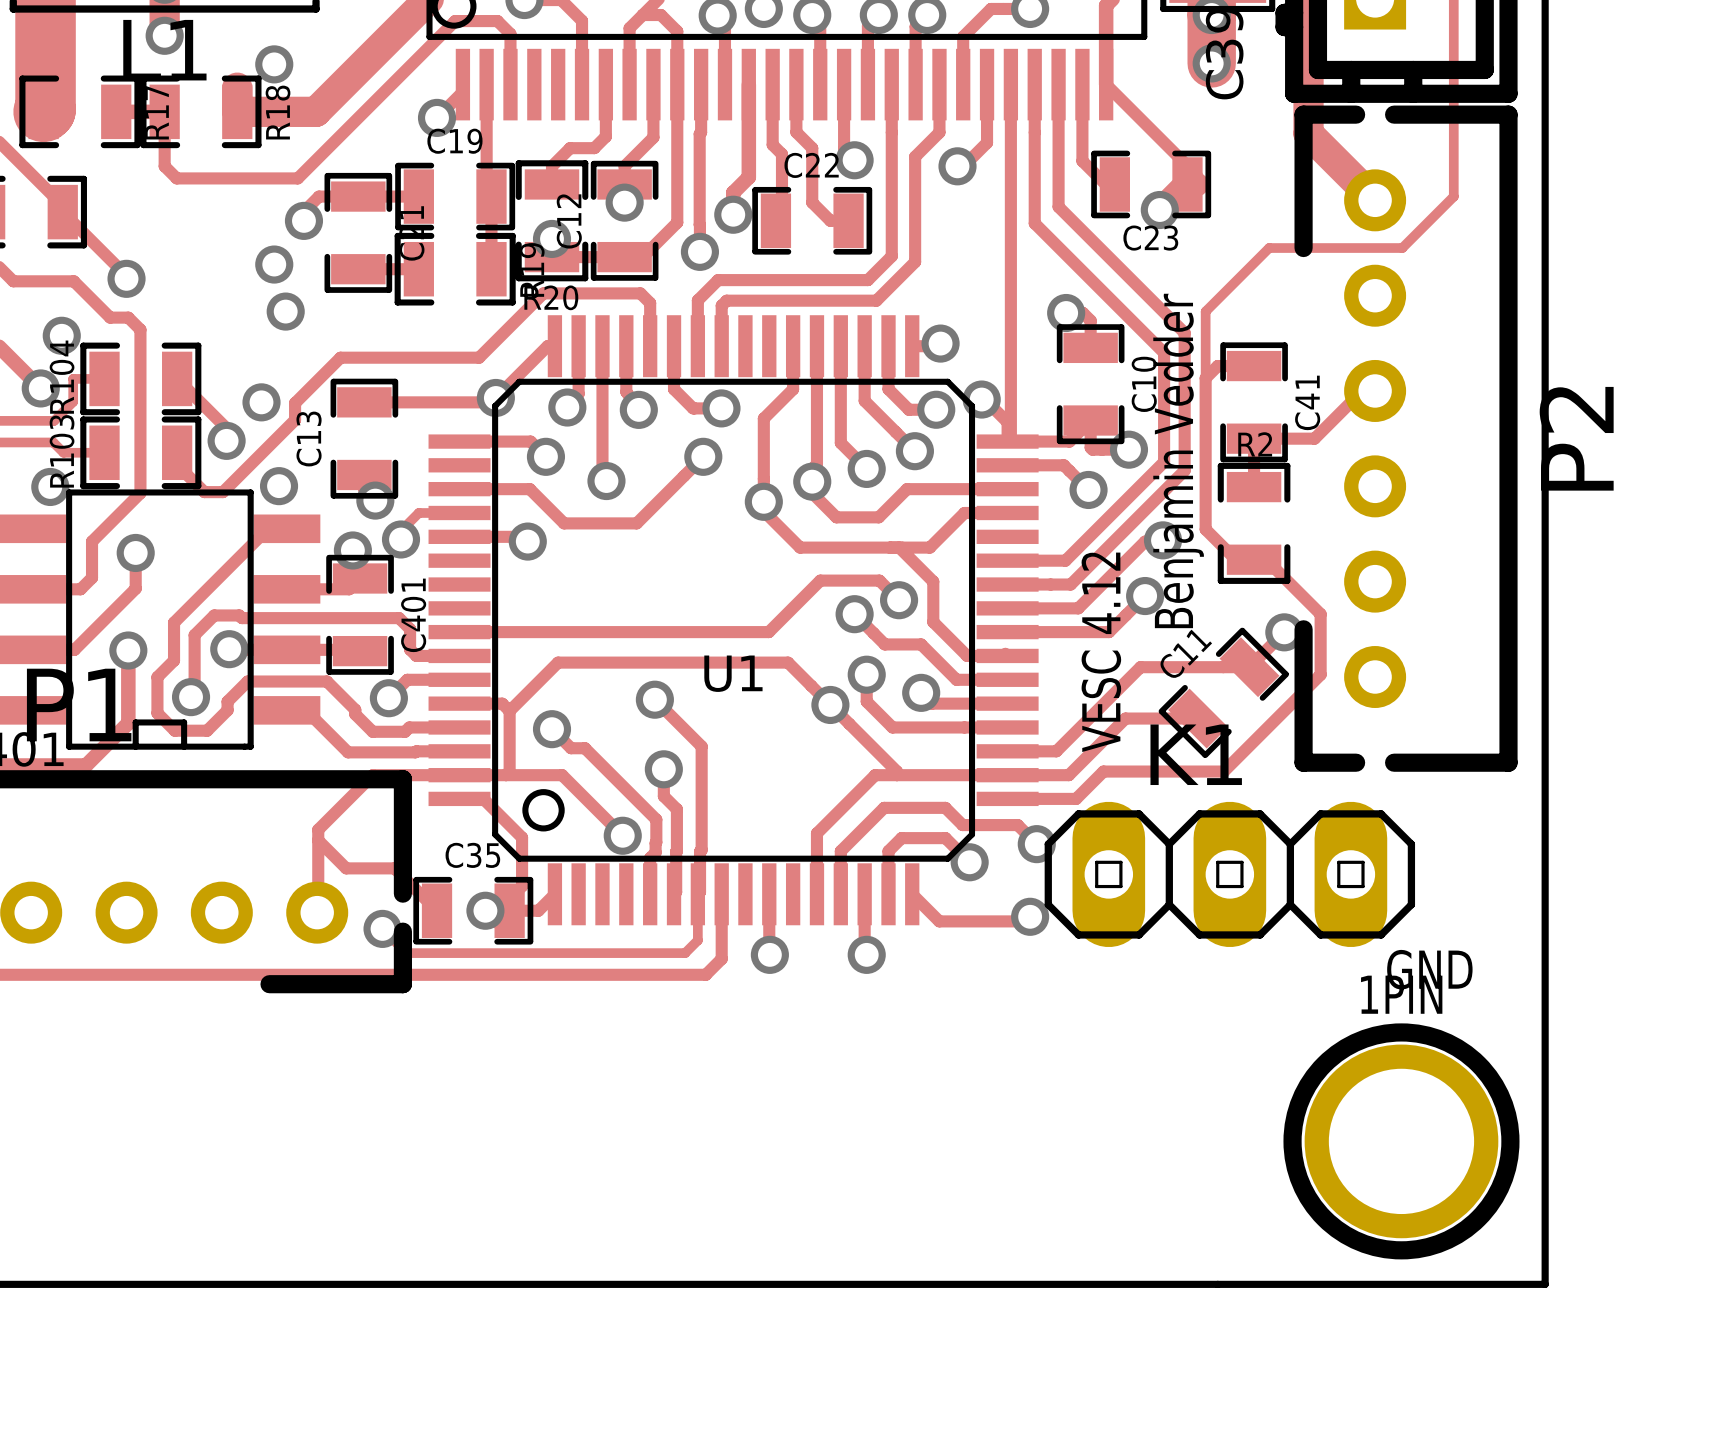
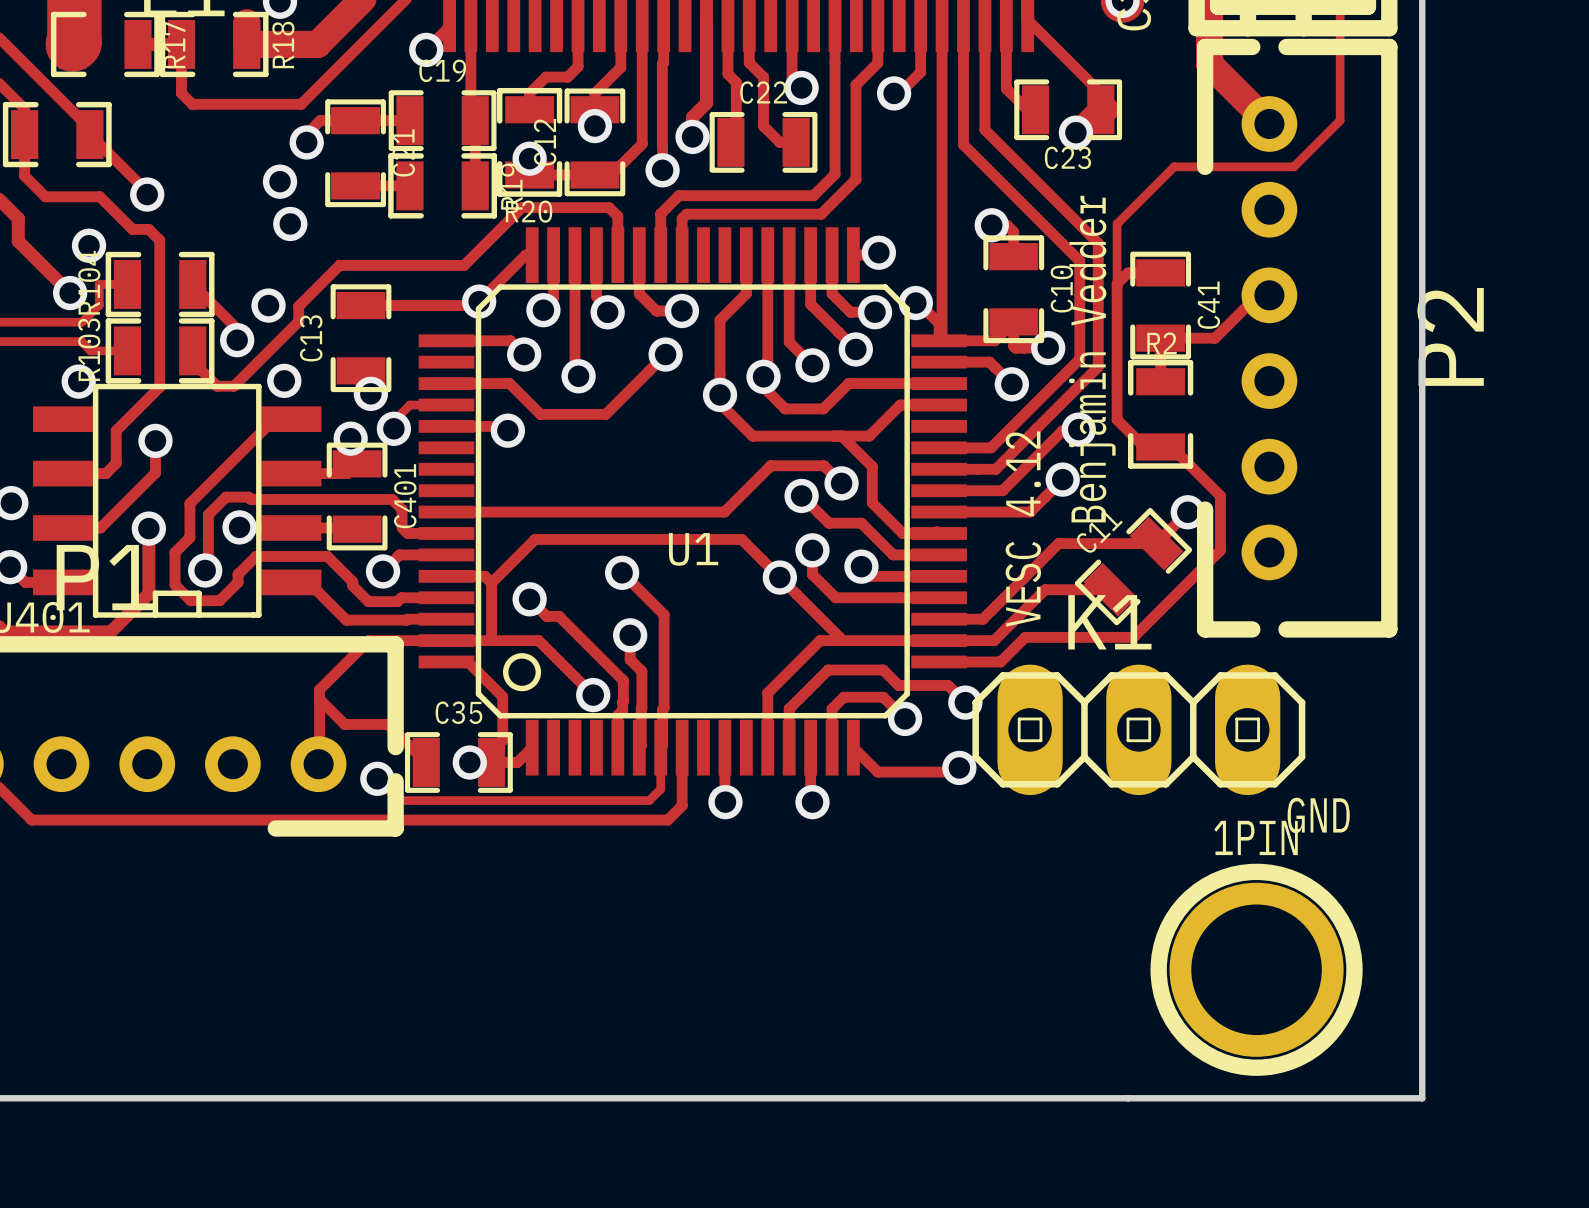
1PIN position: (1401, 1141) -> (1256, 969)

